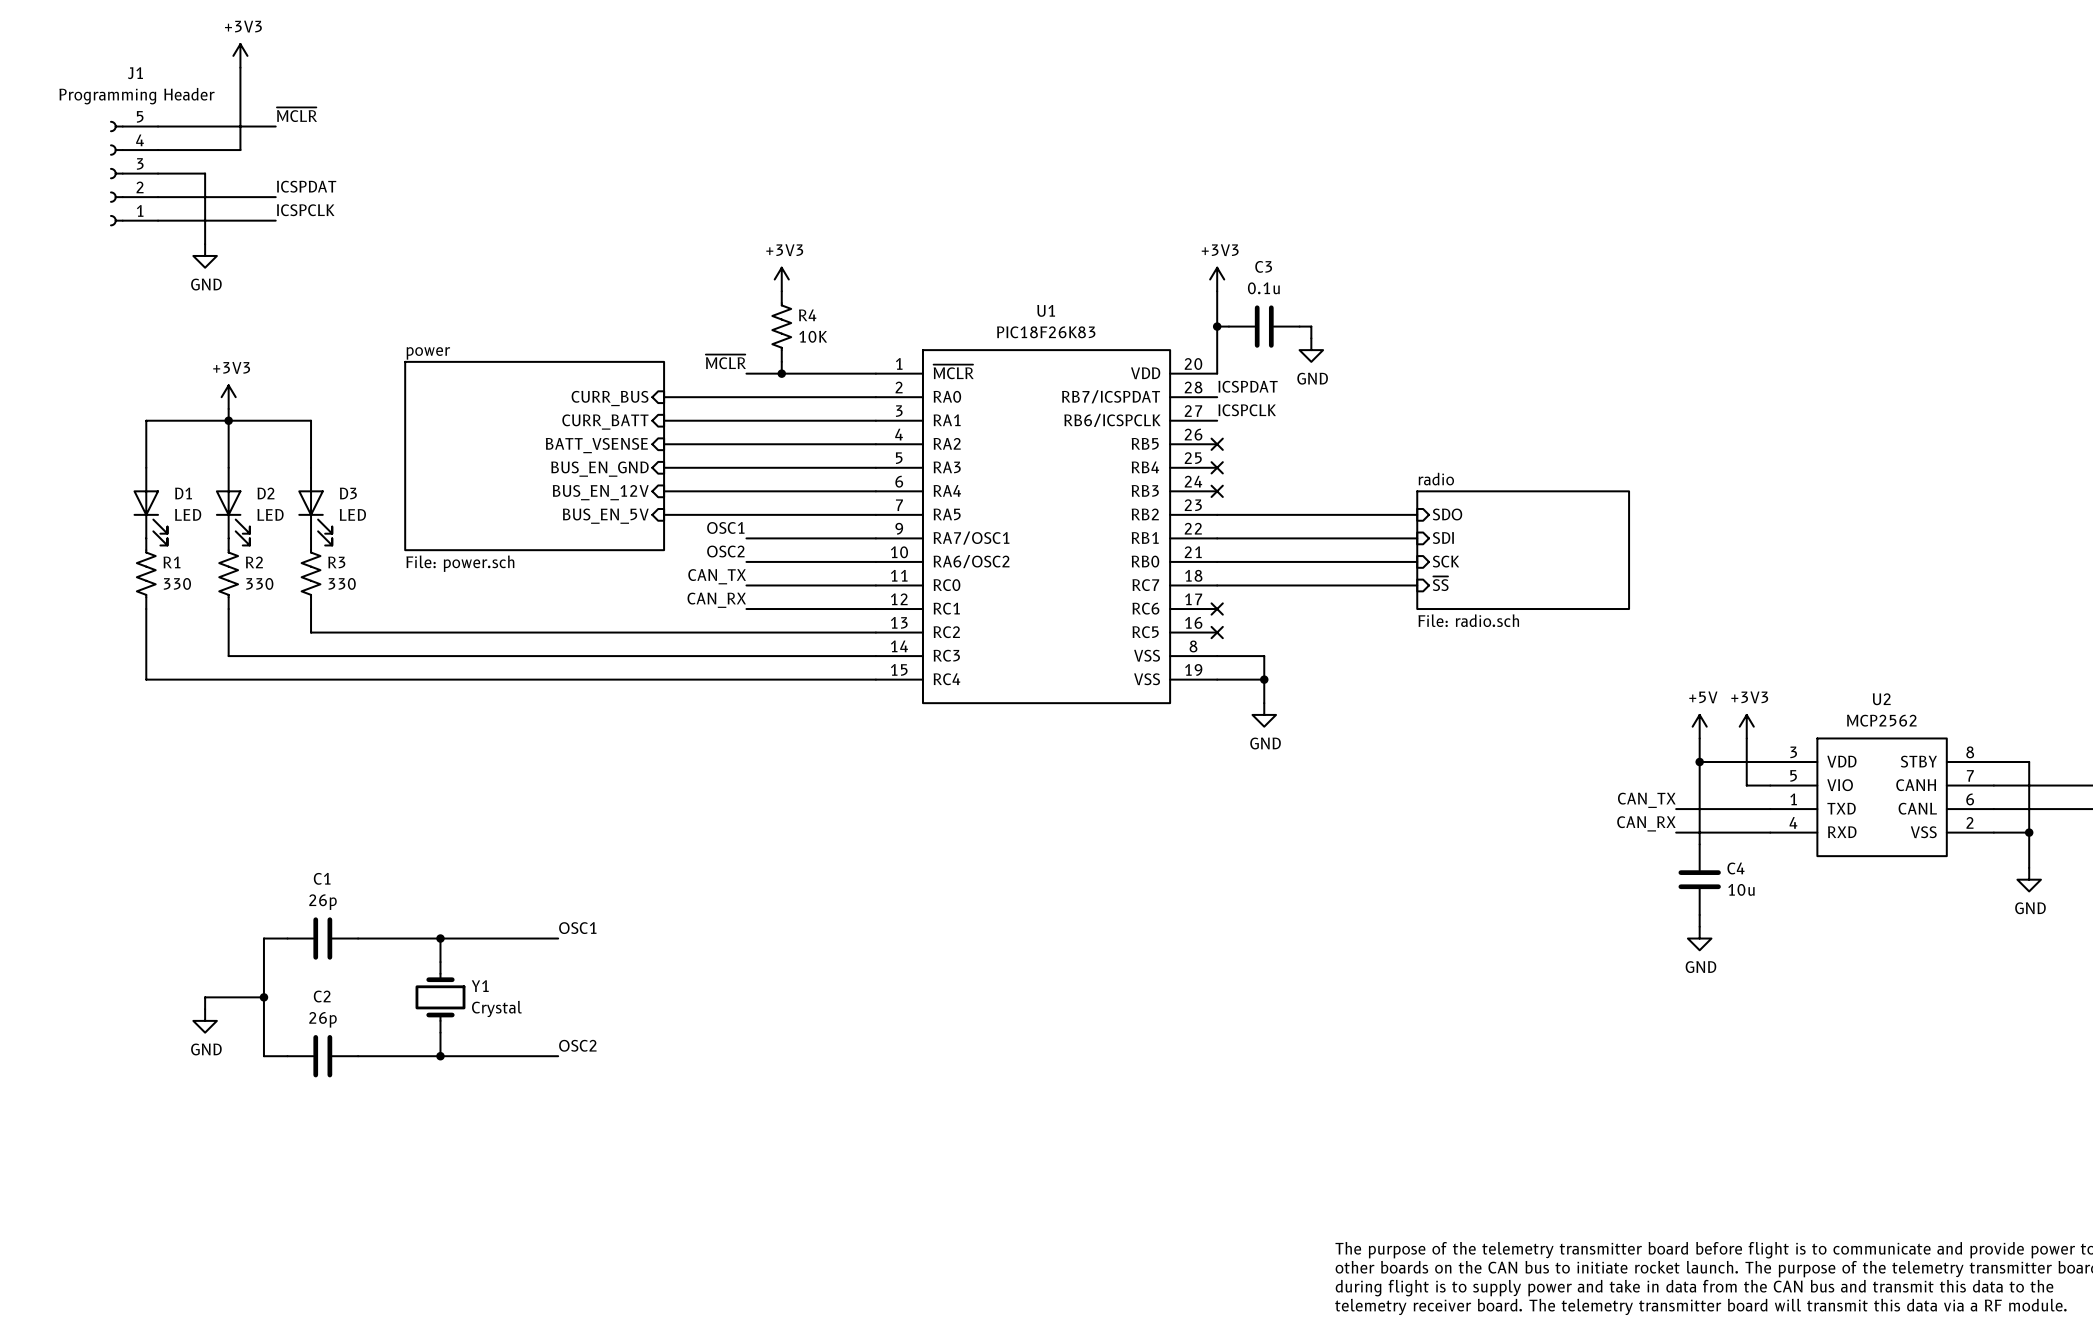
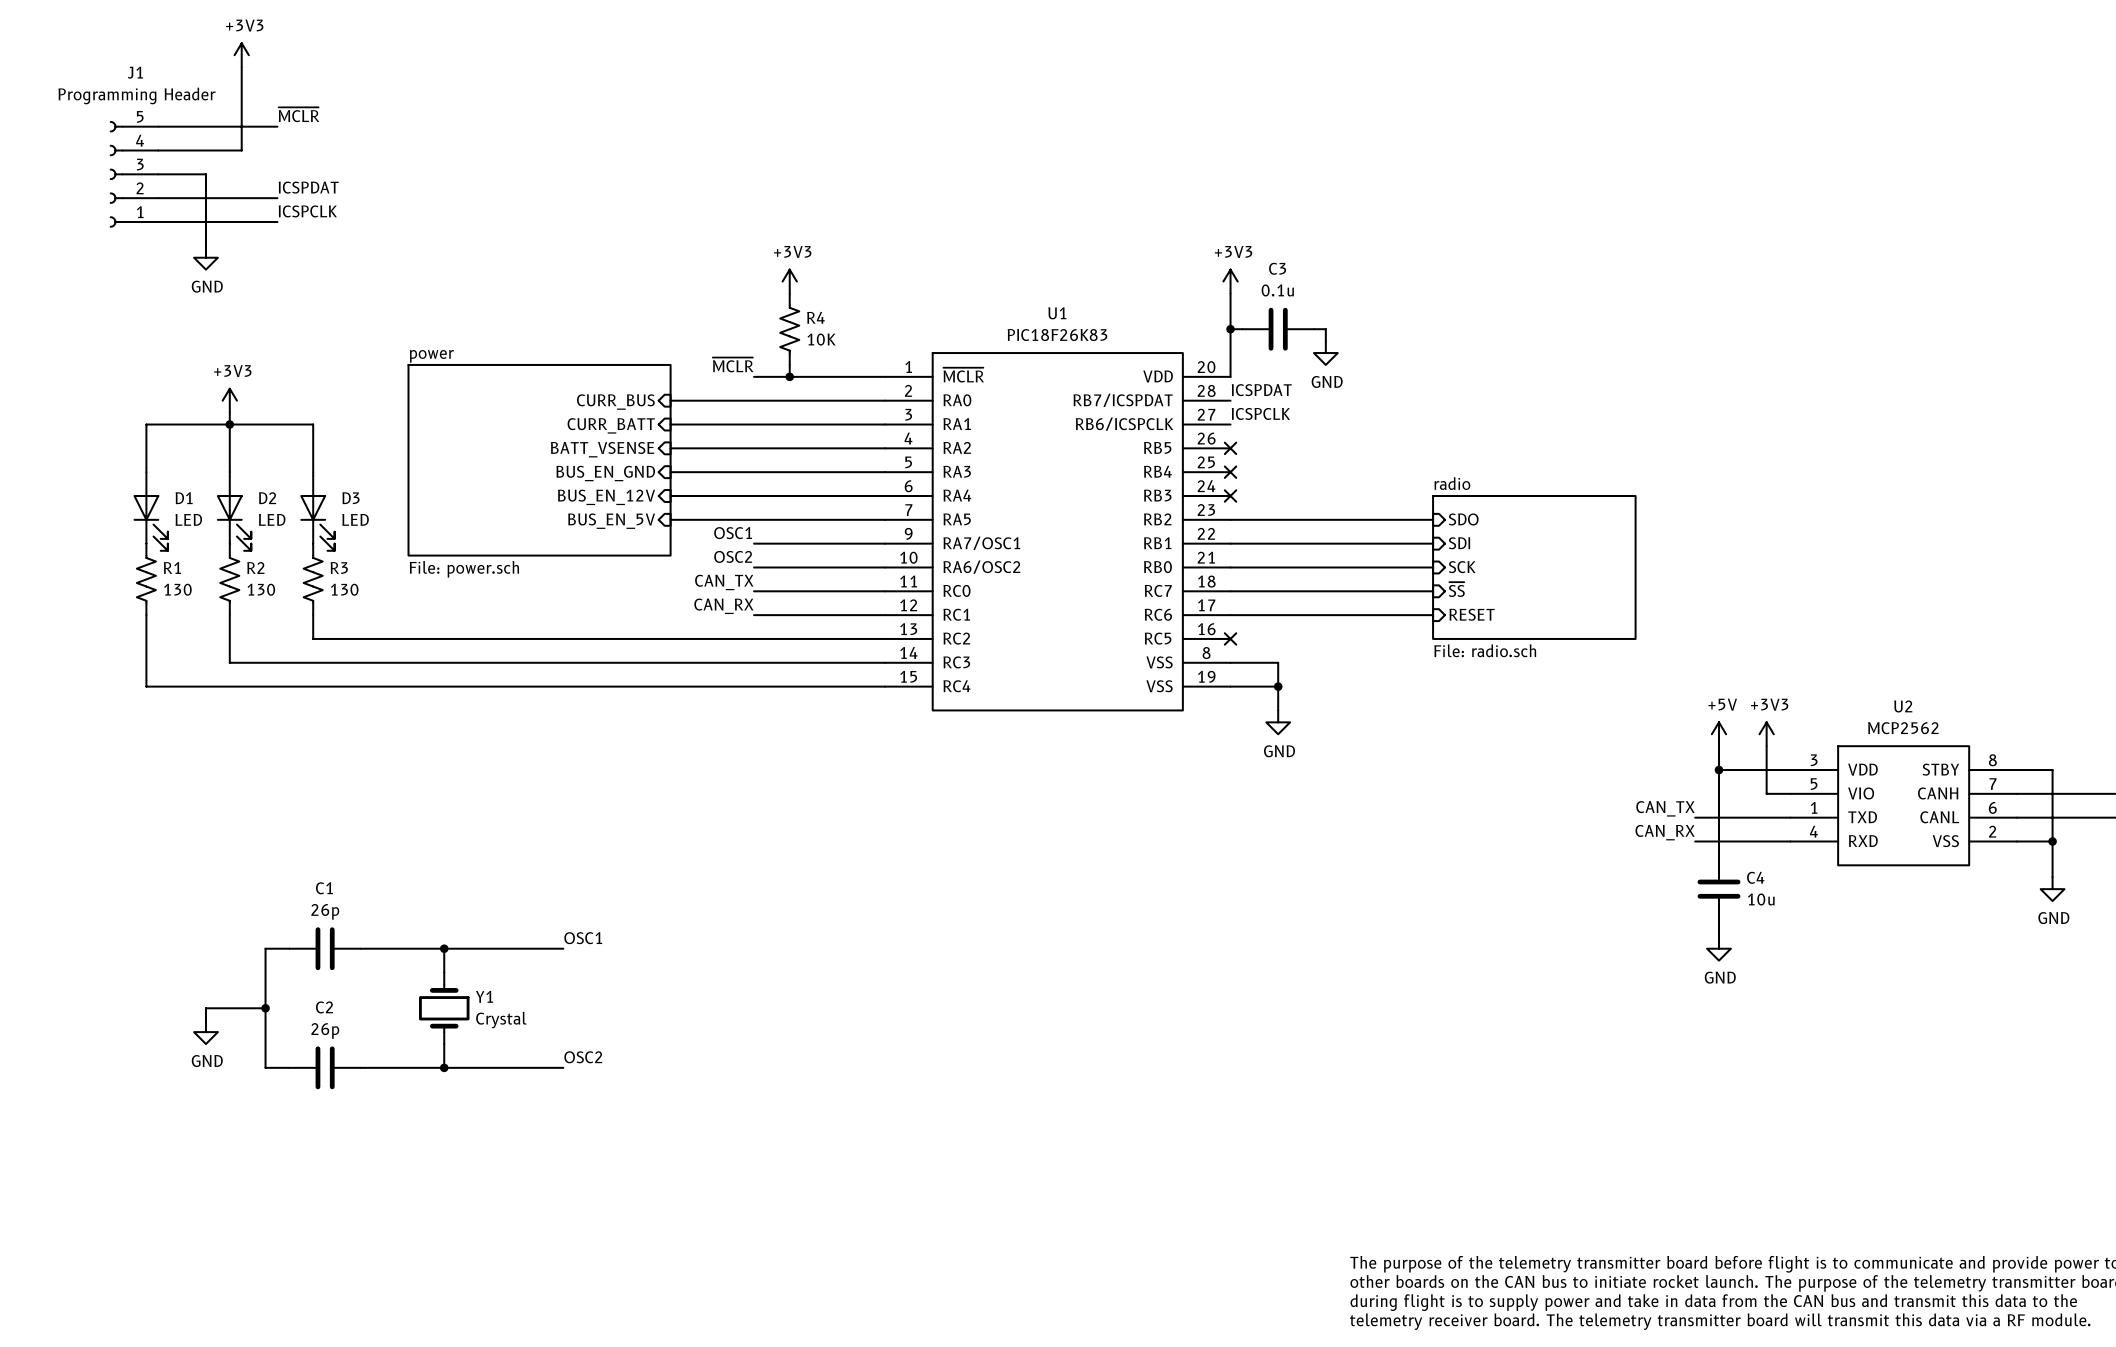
sheet radio: File: radio.sch (1523, 550) -> none
sheet radio: none -> File: radio.sch (1534, 567)
R1 value: 330 (177, 583) -> 130 (177, 589)
R2 value: 330 (259, 583) -> 130 (261, 589)
R3 value: 330 (342, 583) -> 130 (344, 589)
sheet pin: none -> RESET (1471, 614)
wire: none -> (1230, 615) (1433, 615)
no-connect mark: (1217, 609) -> none

